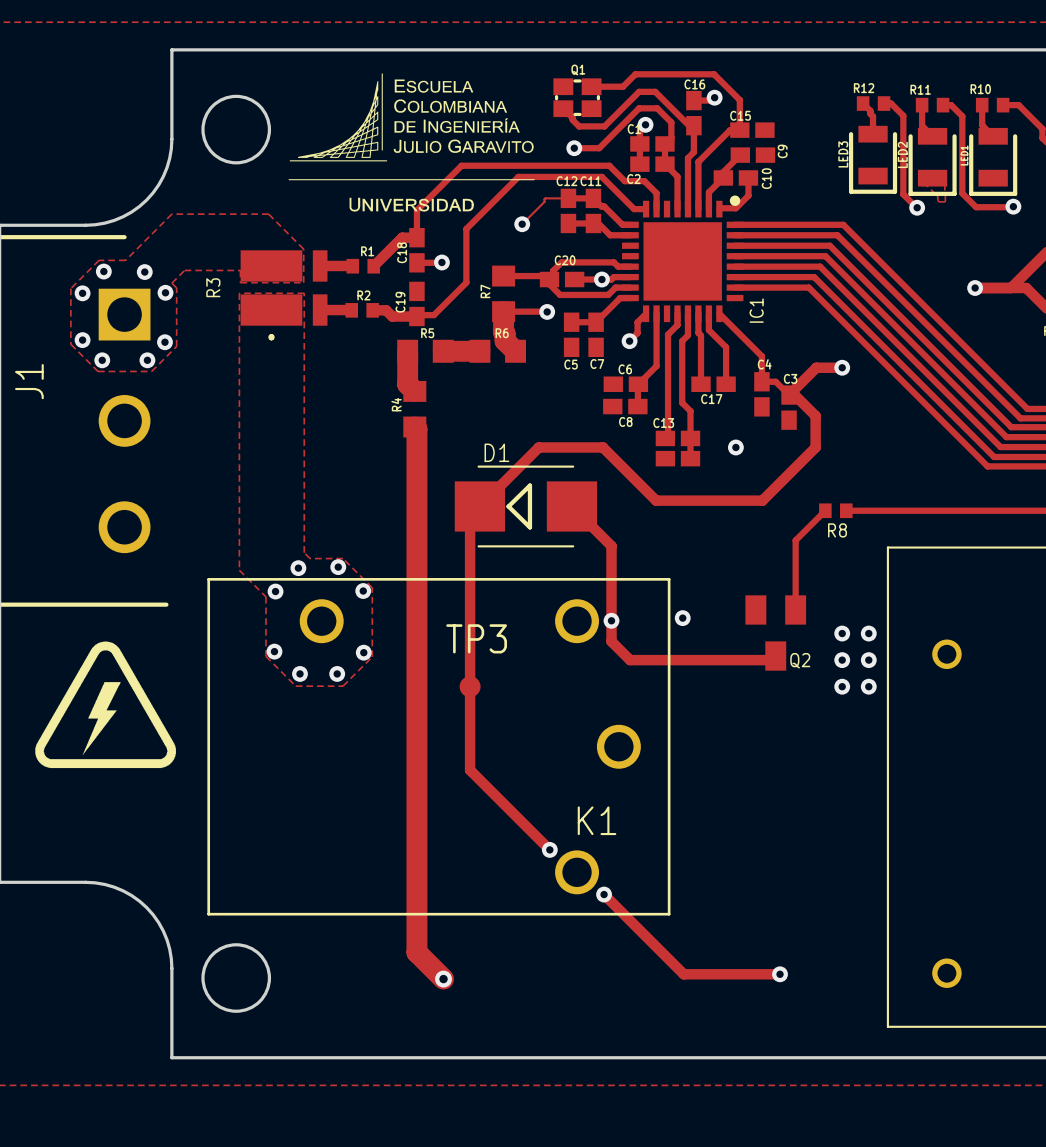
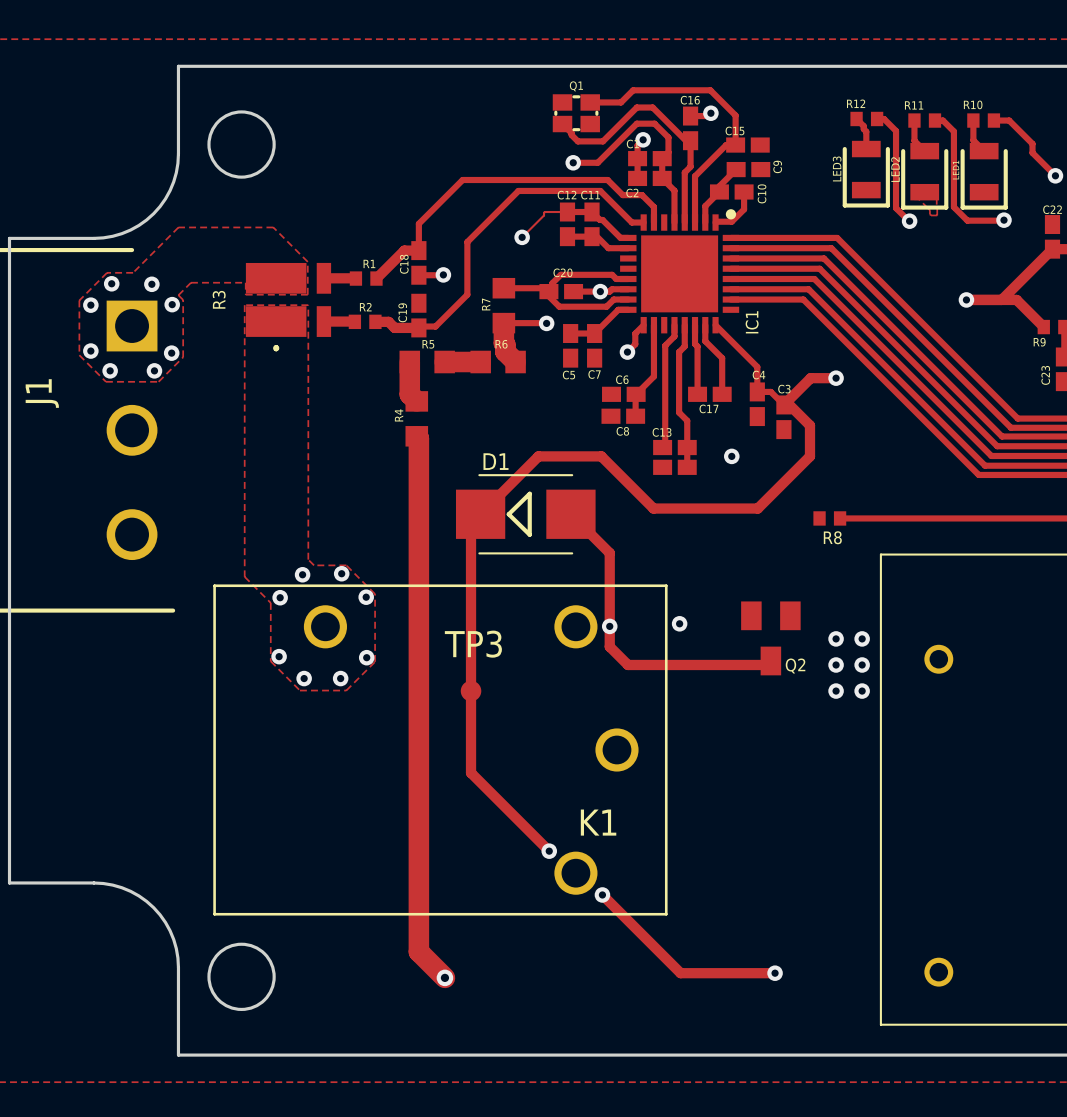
drawing: [288, 73, 535, 212] -> none
track: (825, 510) (795, 540) (795, 609) -> none
drawing: [35, 641, 176, 769] -> none

